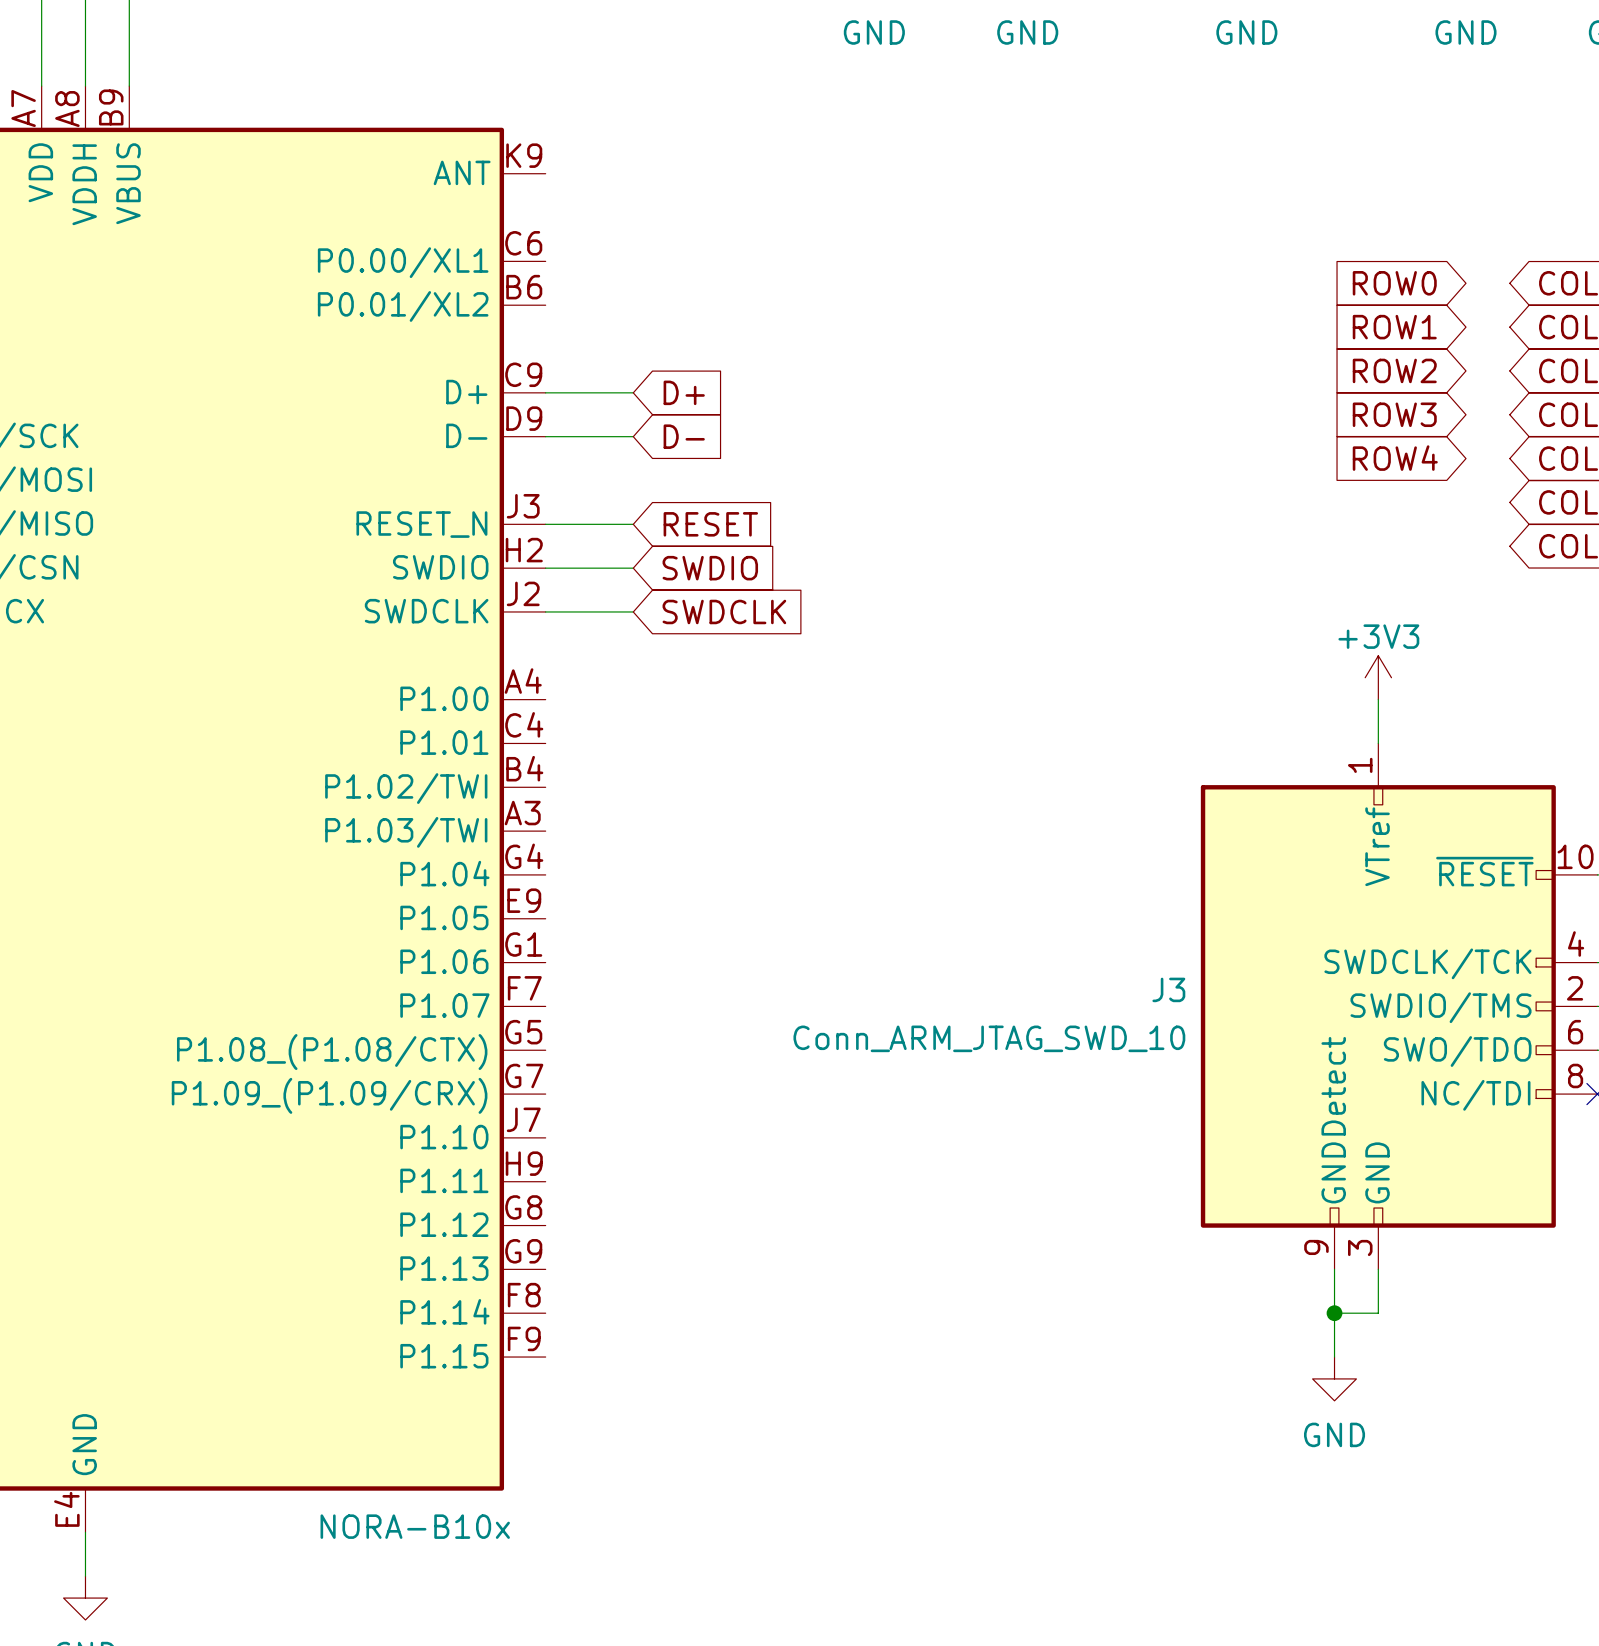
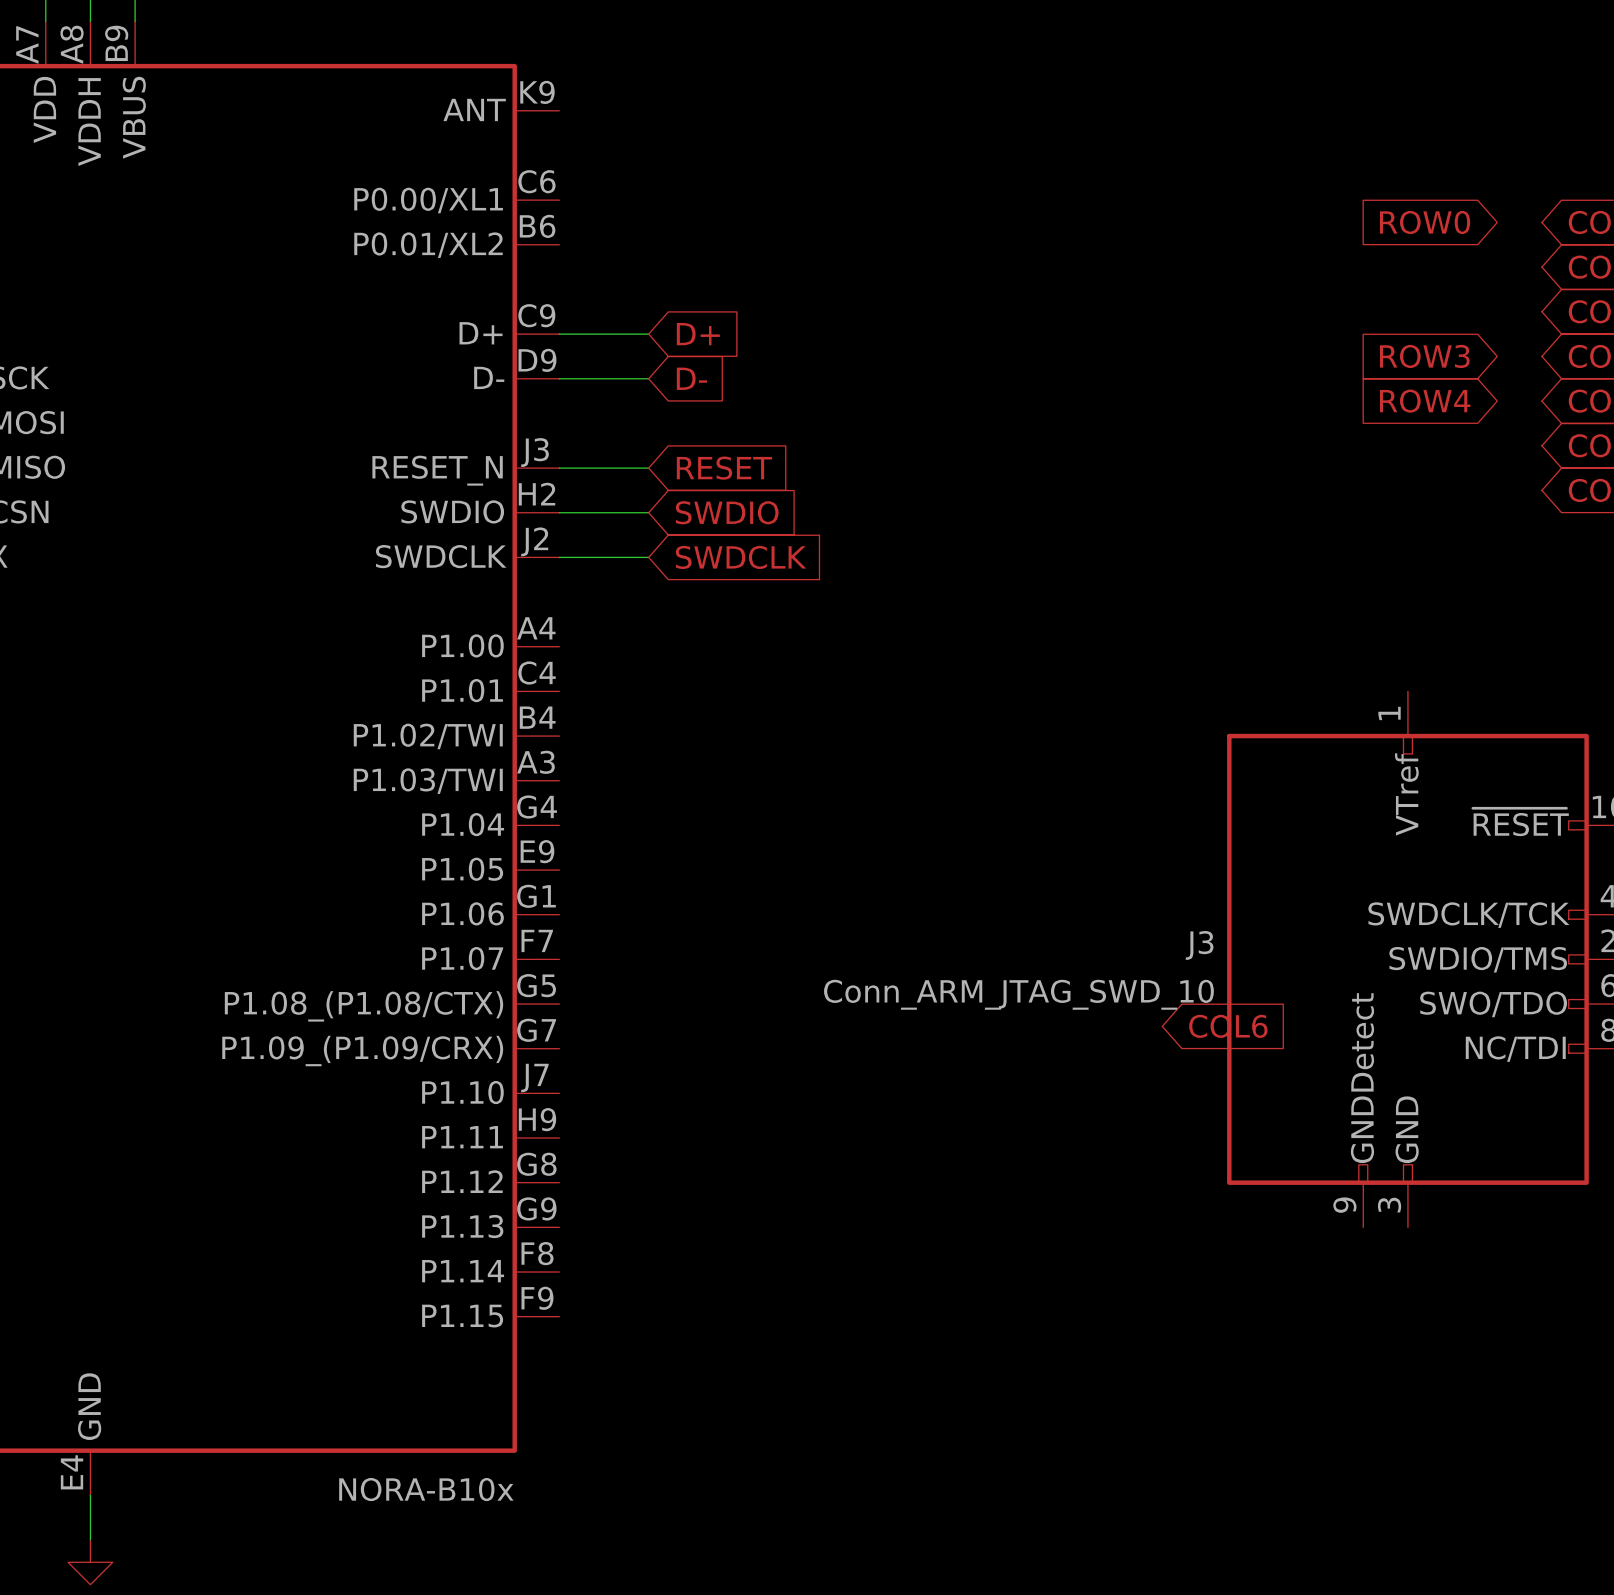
global label: ROW1 (1394, 327) -> none
global label: ROW2 (1394, 370) -> none
power symbol: +3V3 (1378, 677) -> none
wire: (1378, 699) (1378, 743) -> none
global label: none -> COL6 (1228, 1026)
wire: (1334, 1269) (1334, 1357) -> none
wire: (1378, 1269) (1378, 1313) (1334, 1313) -> none
junction: (1334, 1313) -> none
power symbol: GND (1334, 1378) -> none

